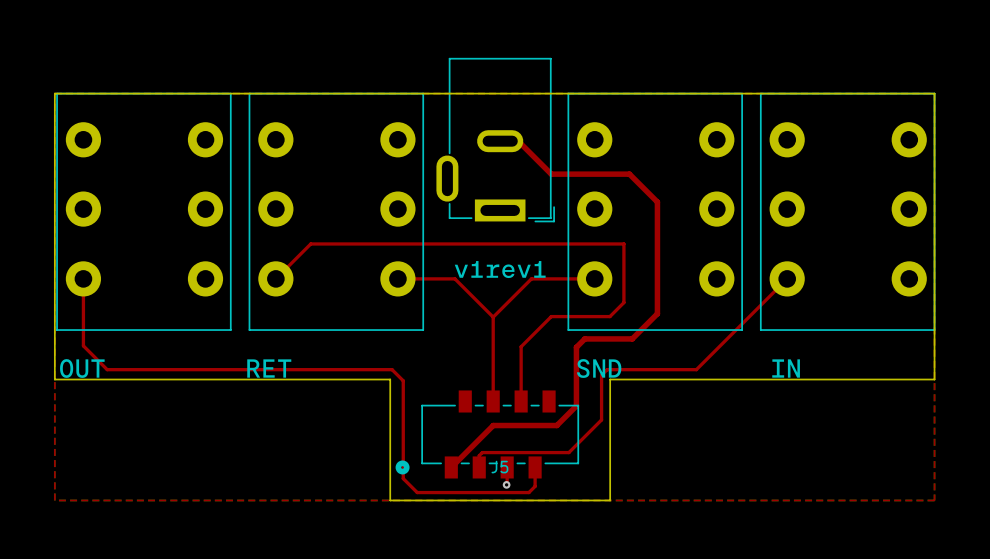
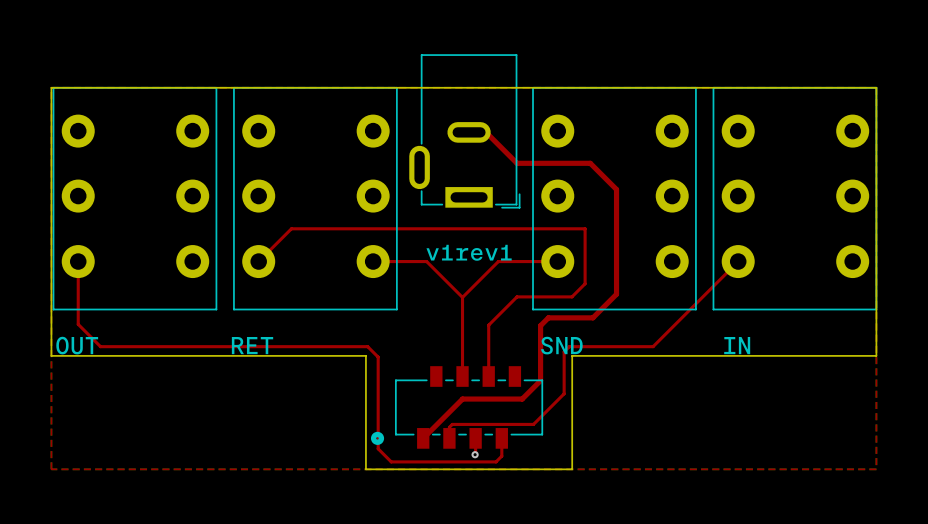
J5 name: J5 (499, 467) -> none

